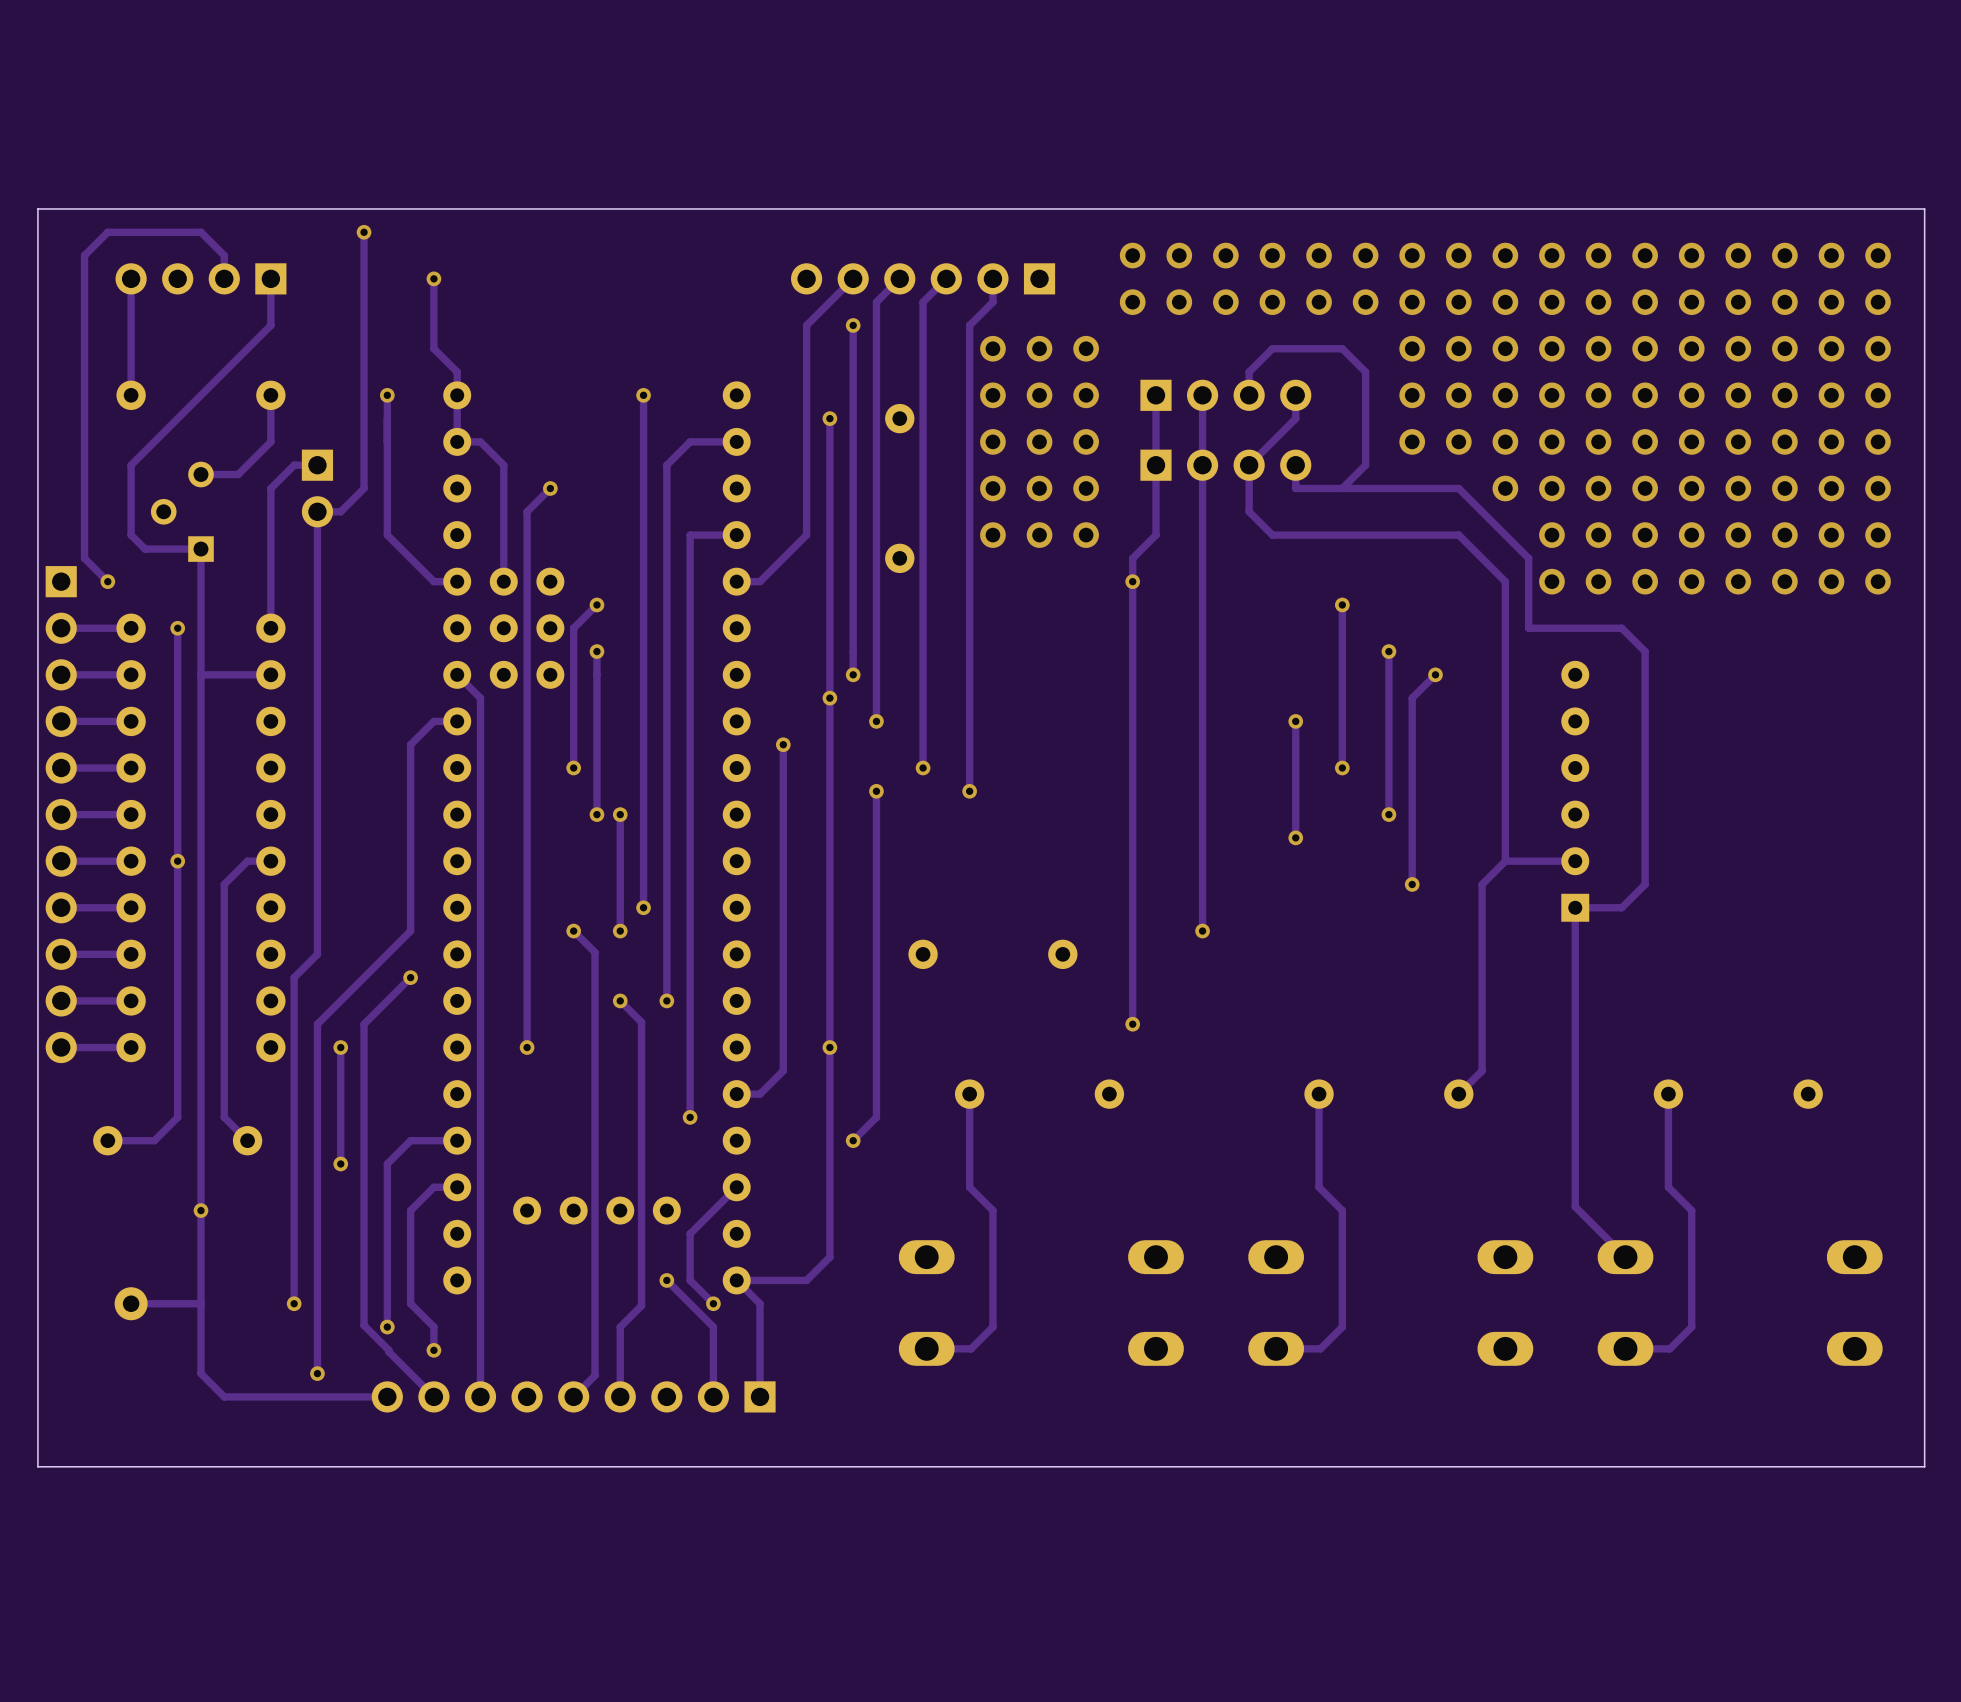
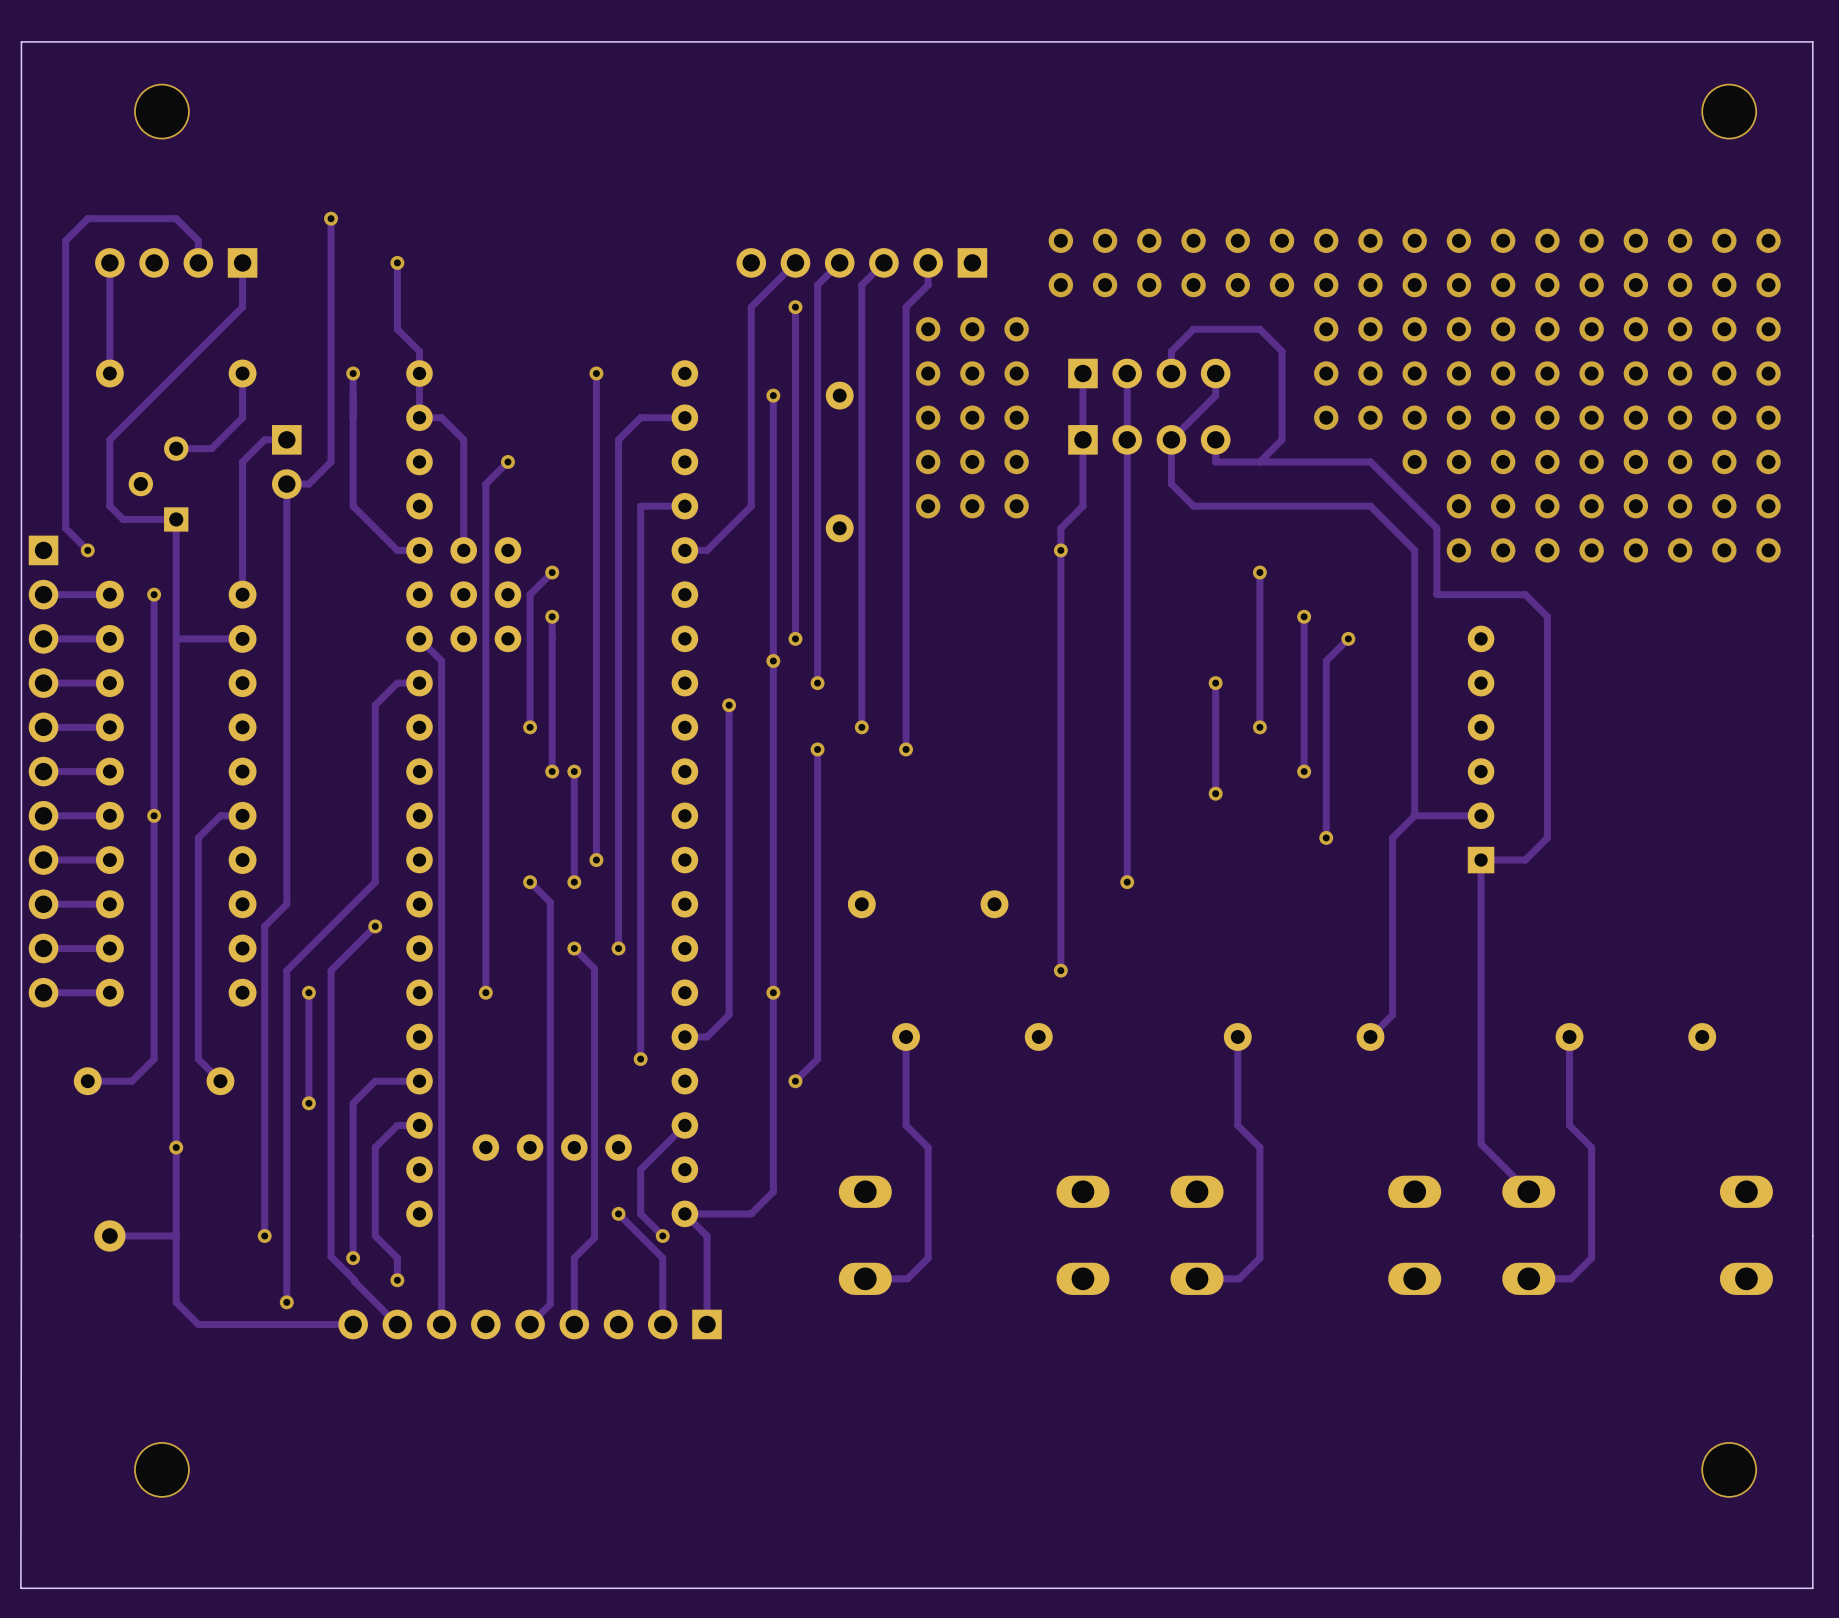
via: none -> (161, 111)
via: none -> (1729, 111)
board edge: (1924, 208) (37, 208) -> (1812, 196) (1812, 41) (21, 41) (21, 196)
board edge: (37, 1303) (37, 1466) (1924, 1466) -> (21, 1588) (1812, 1588) (1812, 1390)
board edge: none -> (21, 1236) (20, 1588)
via: none -> (161, 1469)
via: none -> (1729, 1469)

